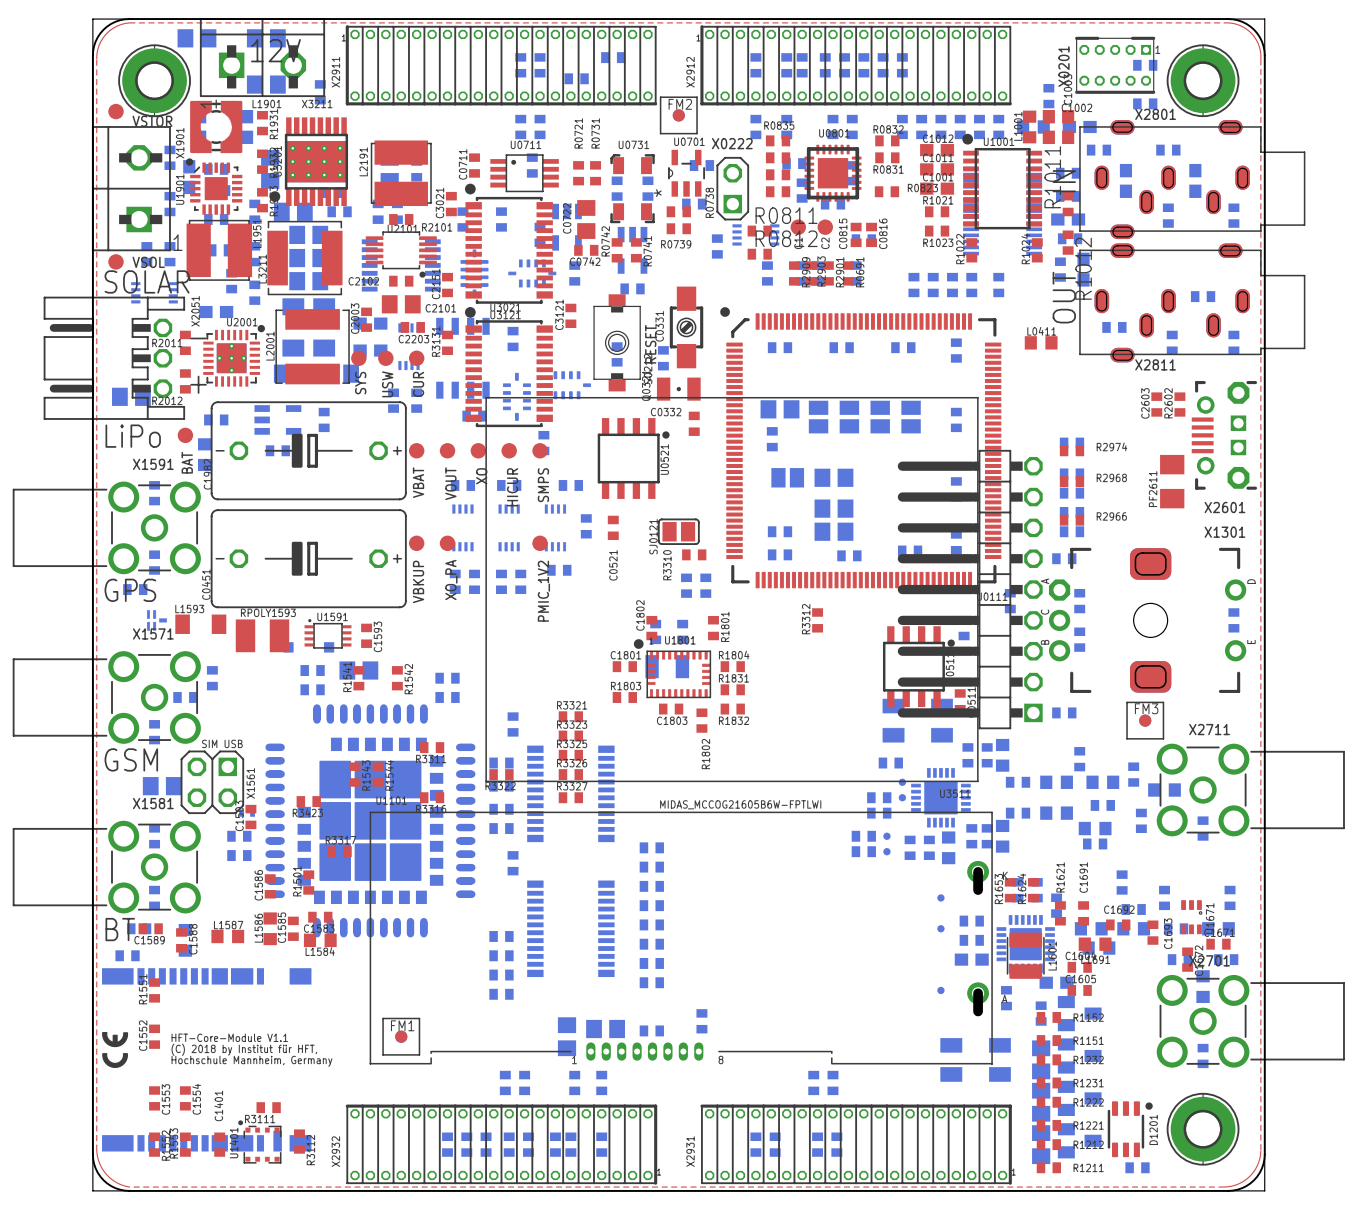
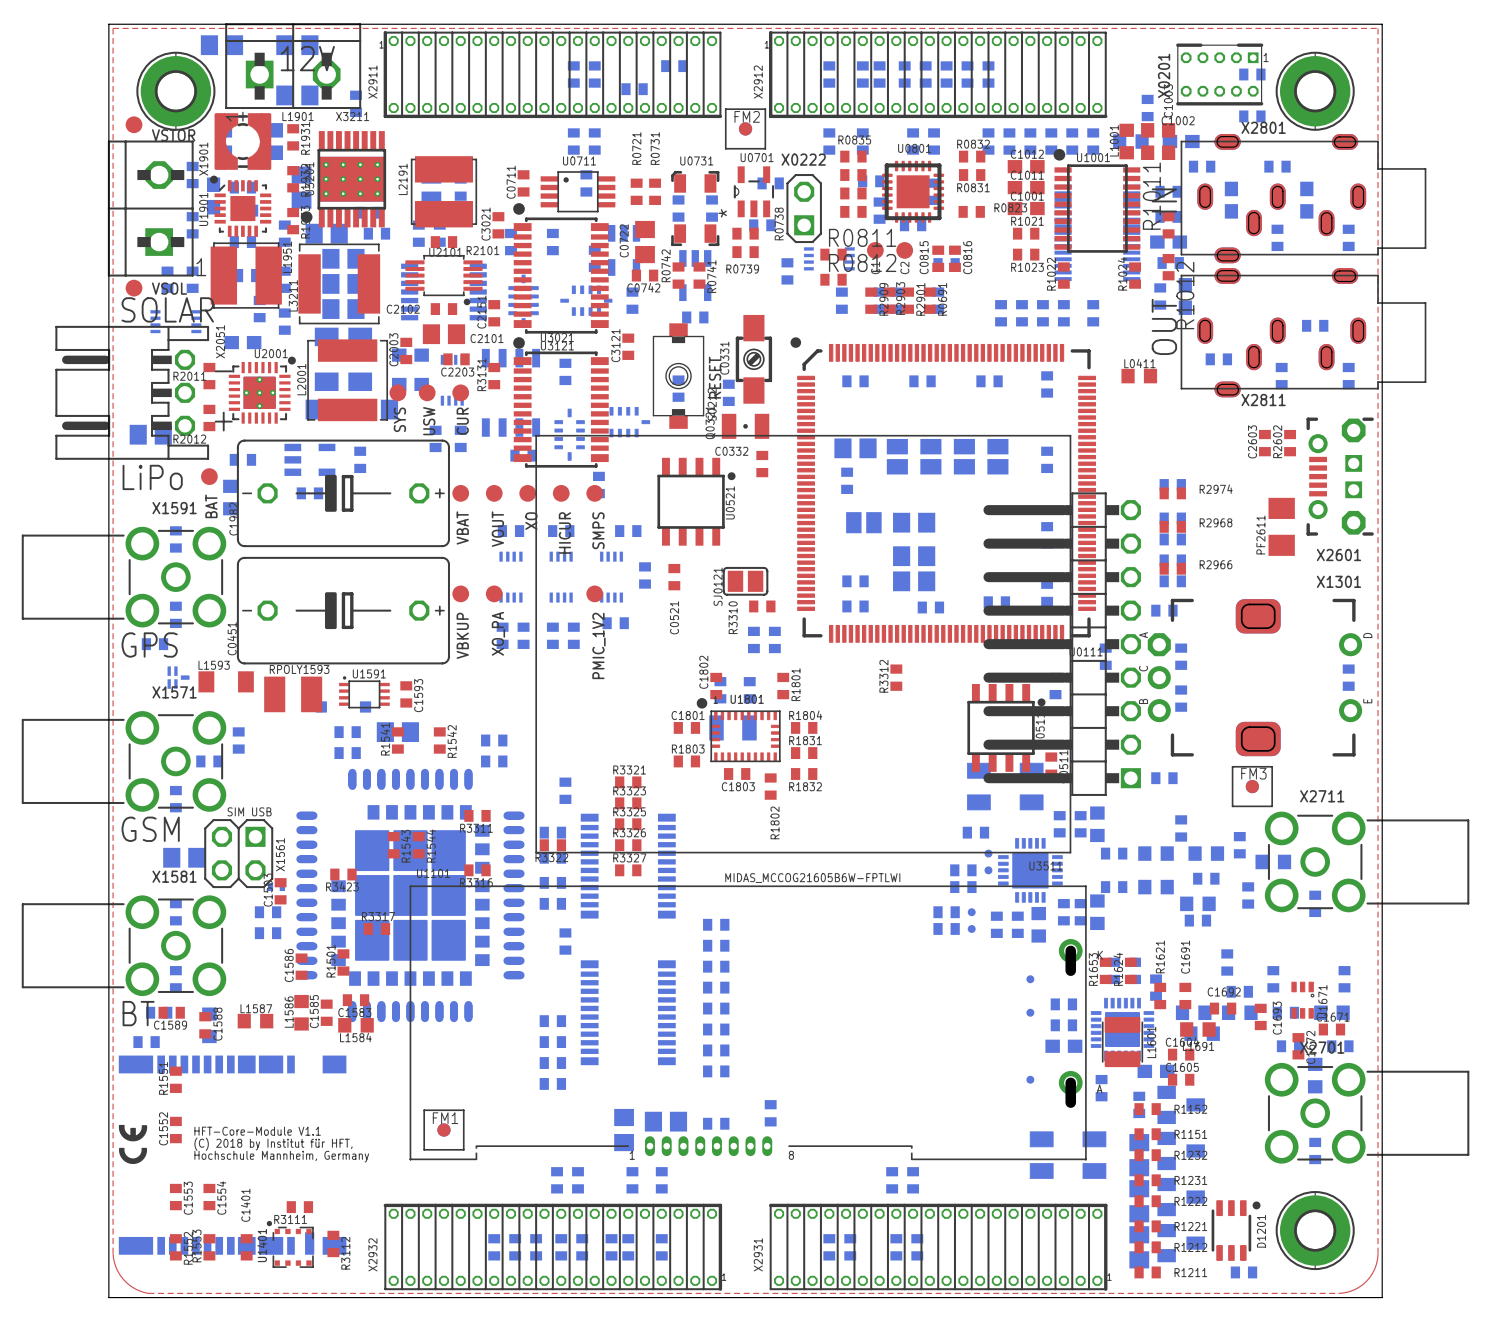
board edge: (129, 19) (1228, 19) (1242, 21) (1254, 29) (1261, 41) (1264, 55) (1264, 1154) (1261, 1168) (1254, 1180) (1242, 1188) (1228, 1190) (129, 1190) (115, 1188) (103, 1180) (95, 1168) (92, 1154) (92, 55) (95, 41) (103, 29) (115, 21) (129, 19) -> none
top zone outline: (129, 22) (116, 26) (105, 34) (98, 46) (96, 59) -> (148, 28) (113, 28) (113, 68)
top zone outline: (1224, 22) (1236, 24) (1250, 32) (1257, 43) (1260, 59) -> (1338, 28) (1378, 28) (1378, 68)
X2601 footprint: [1191, 381, 1258, 490] -> [1306, 417, 1374, 536]
X1301 footprint: [1048, 547, 1247, 693] -> [1147, 598, 1363, 757]

